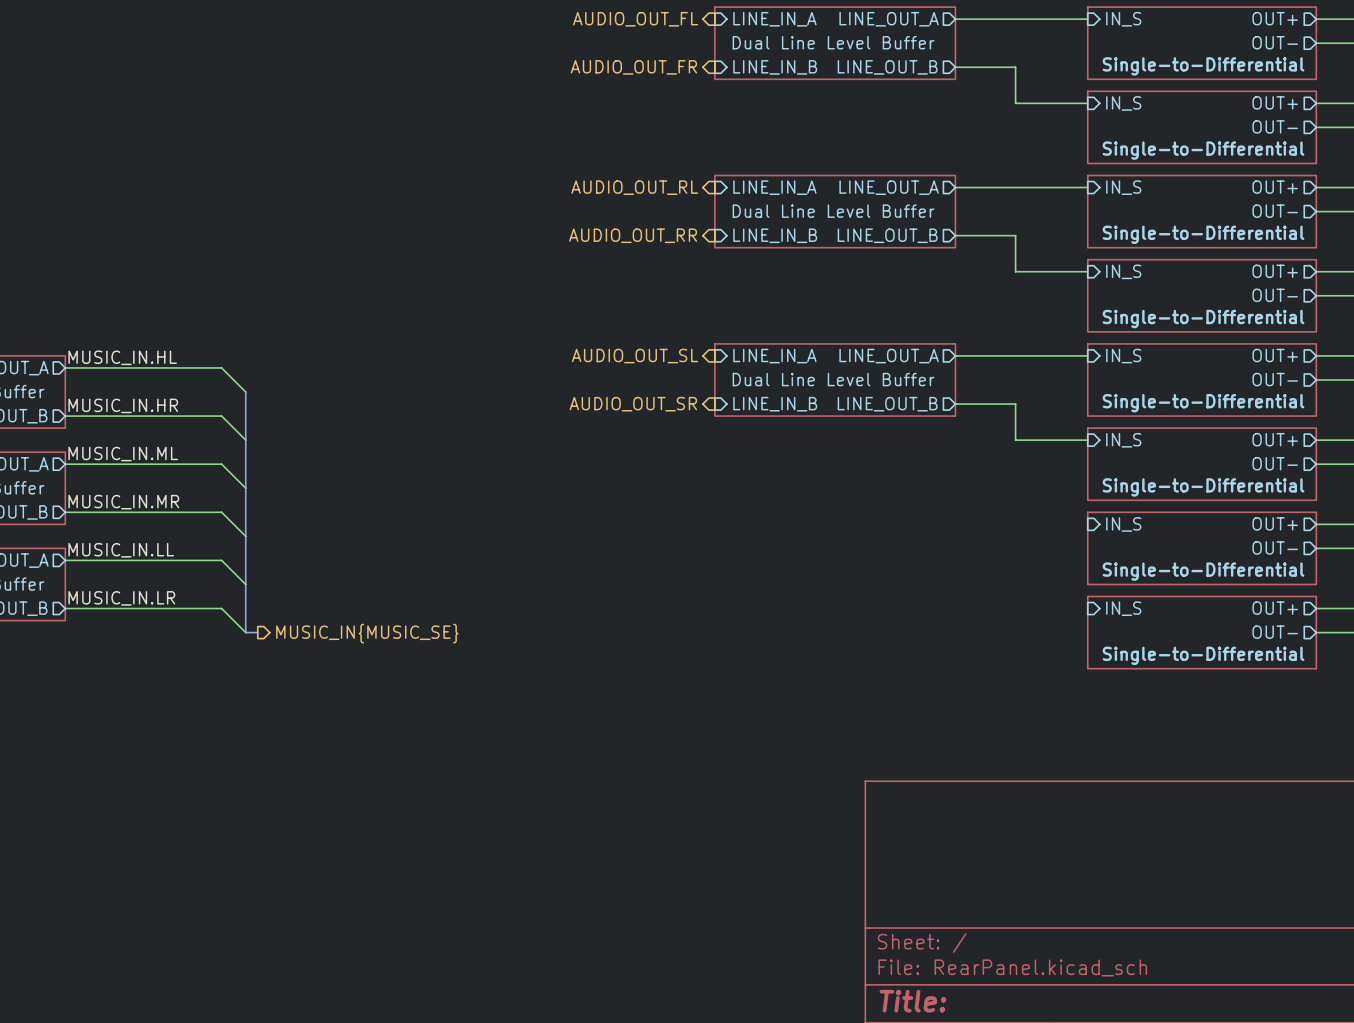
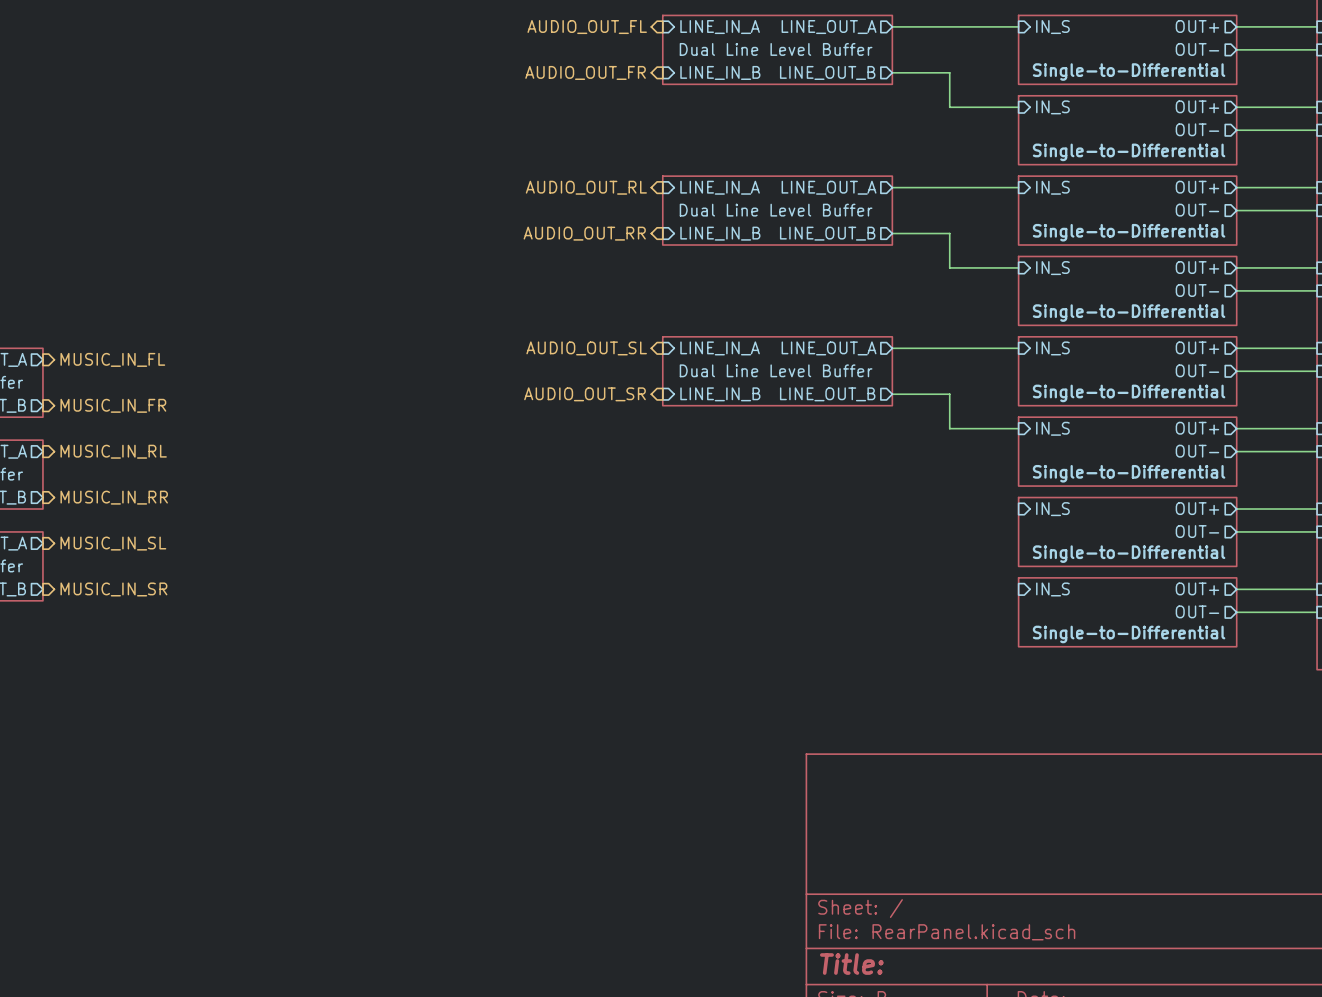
label: MUSIC_IN.HL (122, 357) -> none
wire: (65, 367) (221, 367) (245, 392) -> none
hierarchical label: none -> MUSIC_IN_FL (112, 359)
bus: (245, 392) (245, 632) (257, 632) -> none
label: MUSIC_IN.HR (123, 405) -> none
wire: (65, 416) (221, 416) (245, 440) -> none
hierarchical label: none -> MUSIC_IN_FR (113, 405)
label: MUSIC_IN.ML (123, 454) -> none
wire: (65, 464) (221, 464) (245, 488) -> none
hierarchical label: none -> MUSIC_IN_RL (113, 451)
label: MUSIC_IN.MR (123, 502) -> none
wire: (65, 512) (221, 512) (245, 536) -> none
hierarchical label: none -> MUSIC_IN_RR (114, 497)
label: MUSIC_IN.LL (121, 550) -> none
wire: (65, 560) (221, 560) (245, 584) -> none
hierarchical label: none -> MUSIC_IN_SL (113, 543)
label: MUSIC_IN.LR (121, 598) -> none
wire: (65, 608) (221, 608) (245, 632) -> none
hierarchical label: none -> MUSIC_IN_SR (113, 589)
hierarchical label: MUSIC_IN{MUSIC_SE} (367, 633) -> none

